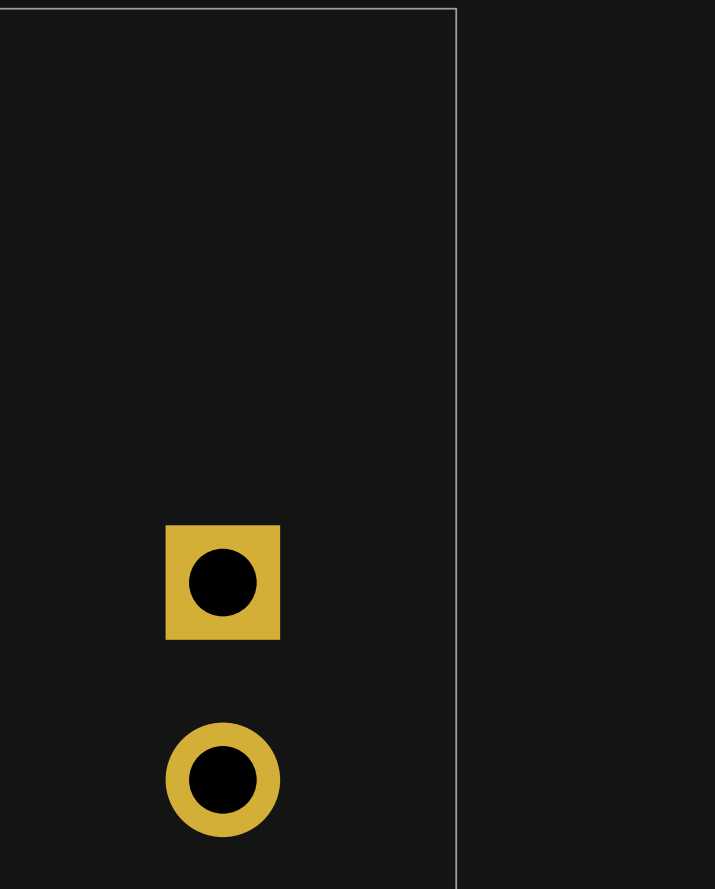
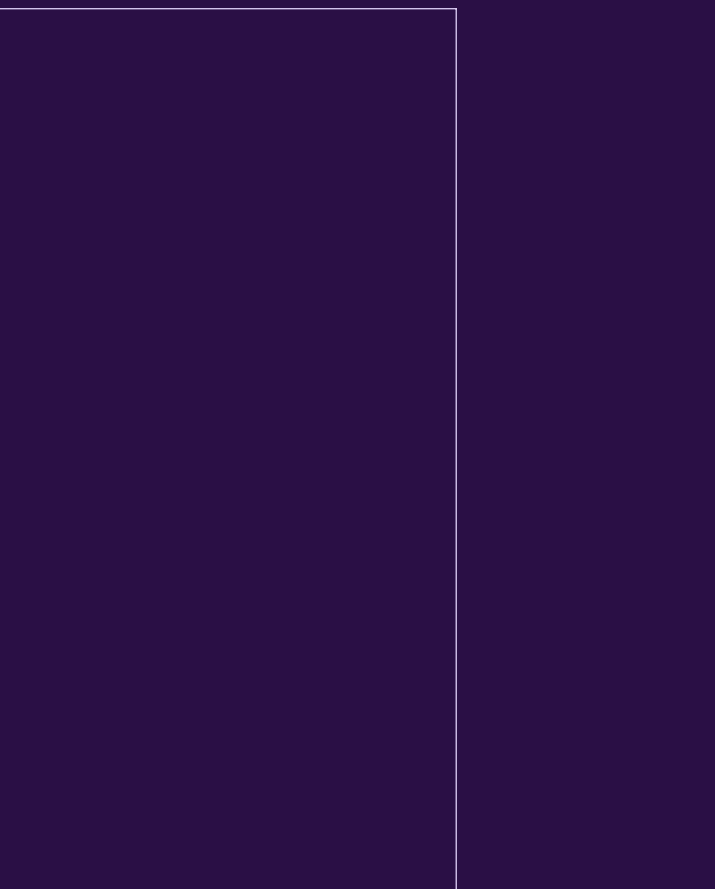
part: (222, 681) -> none

